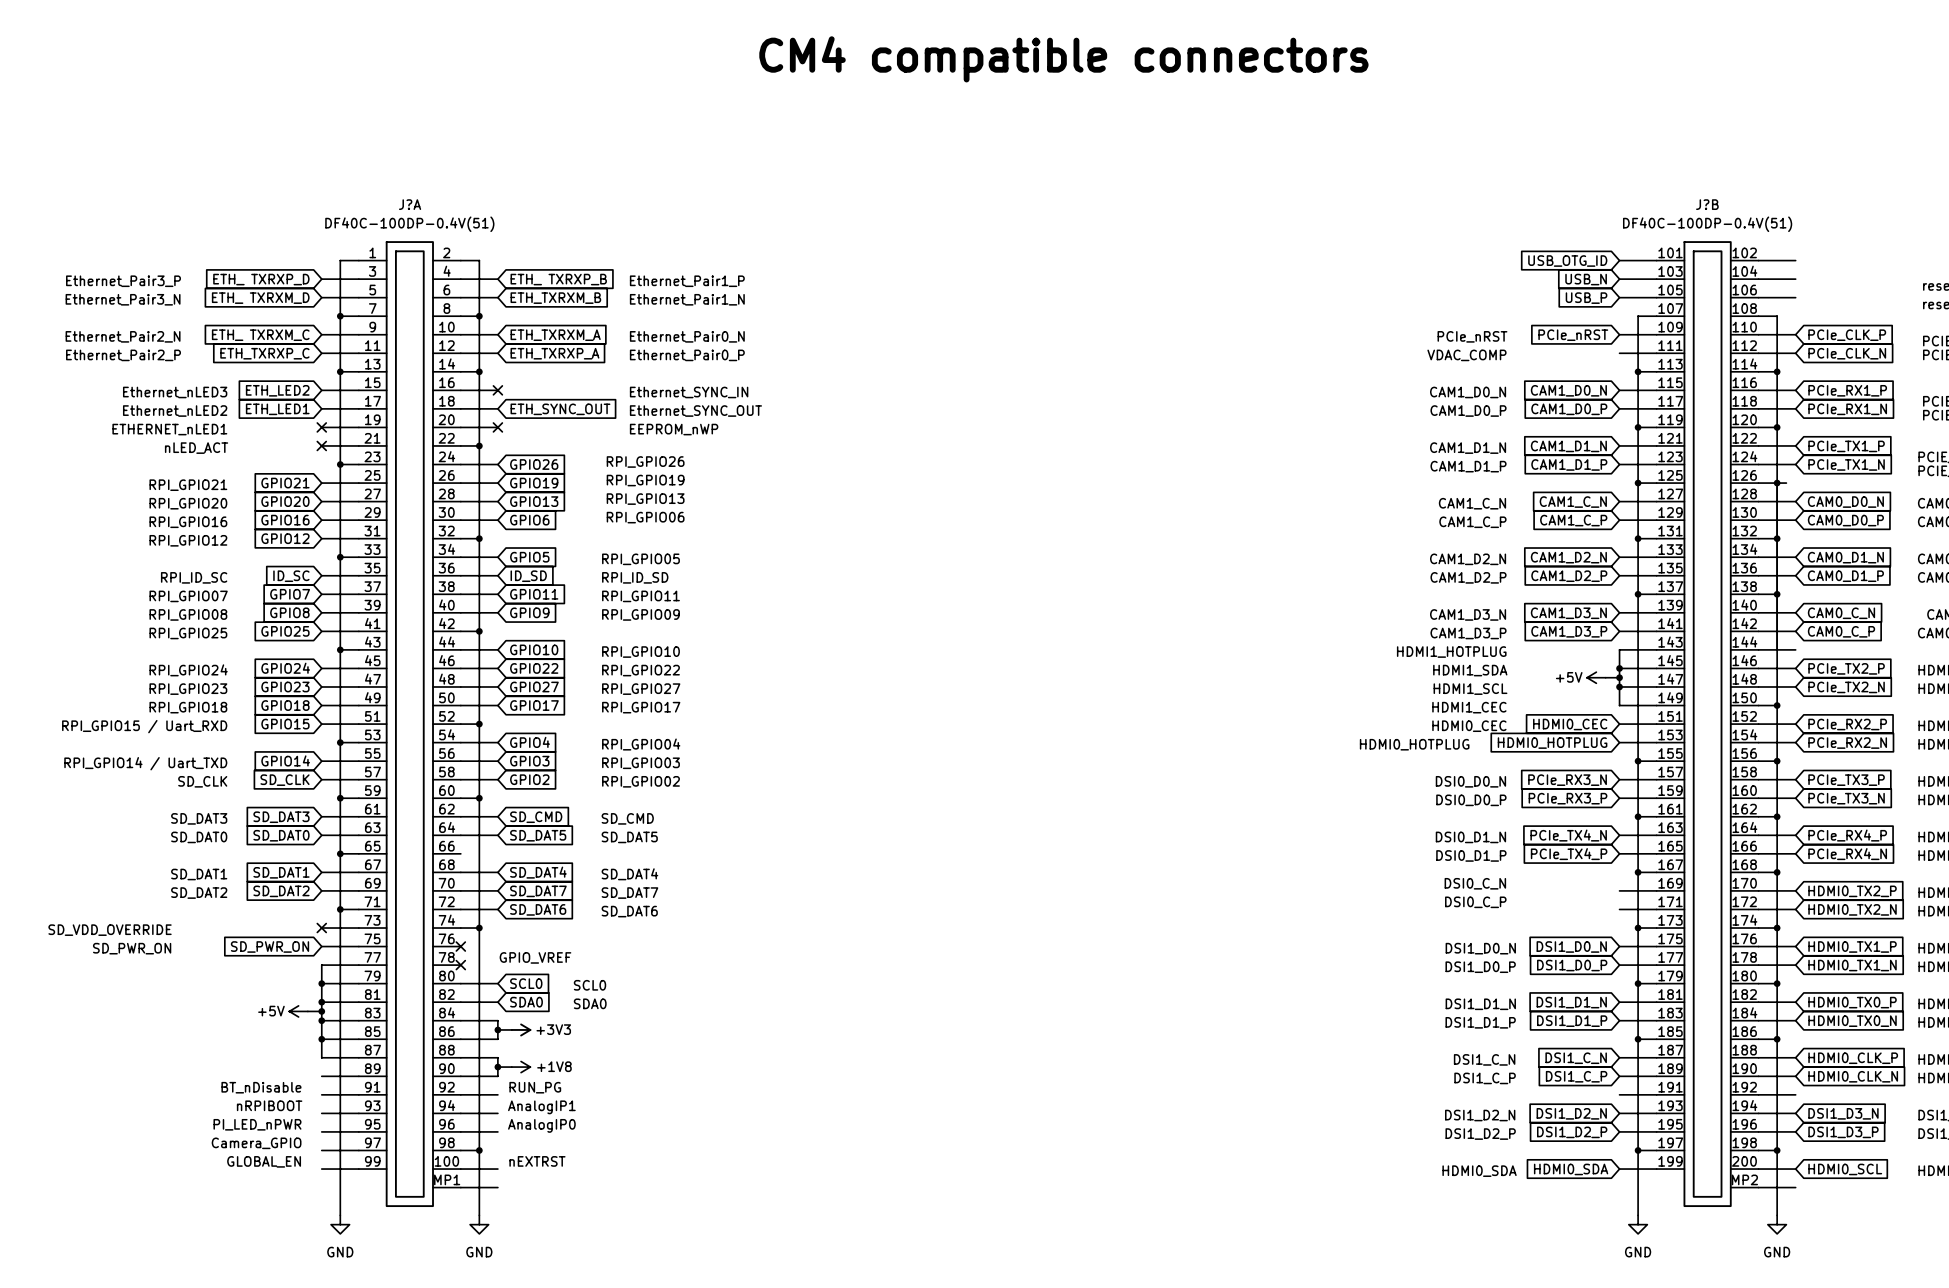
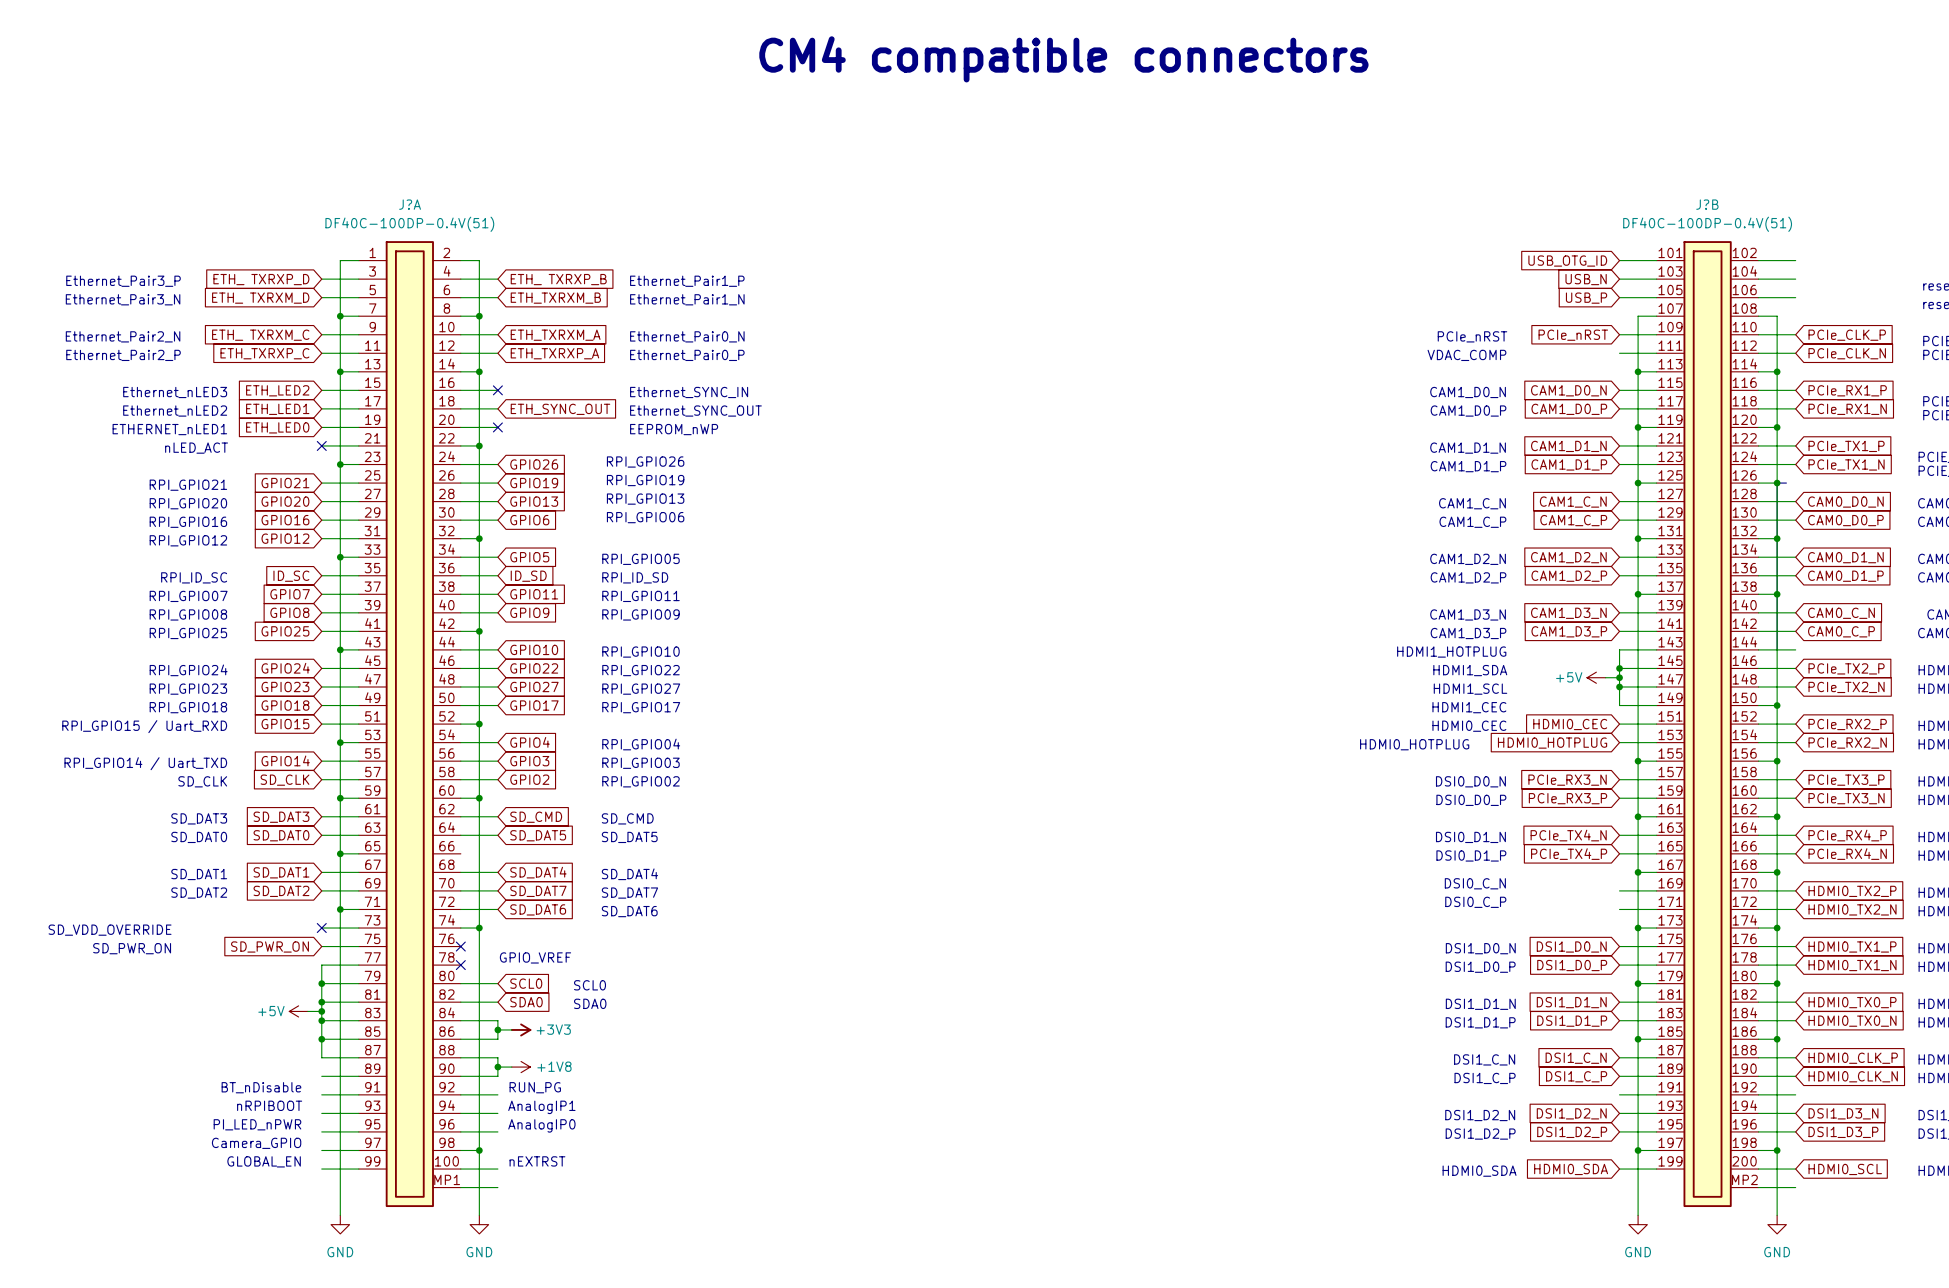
global label: none -> ETH_LED0 (277, 427)
no-connect mark: (321, 427) -> none

